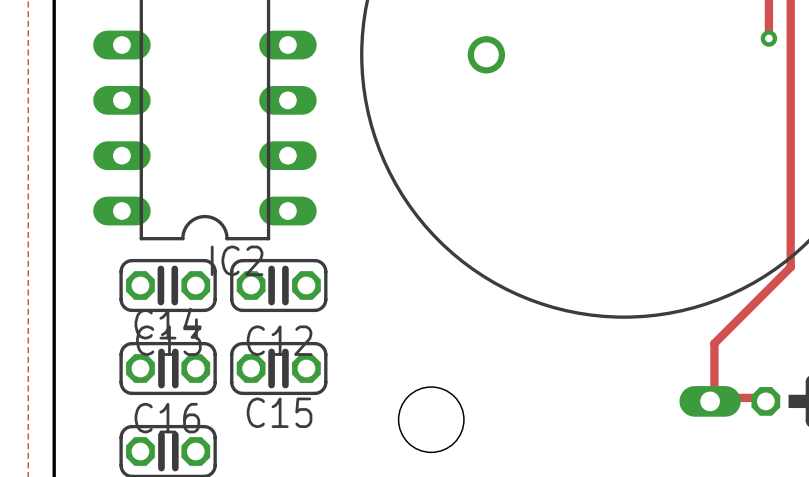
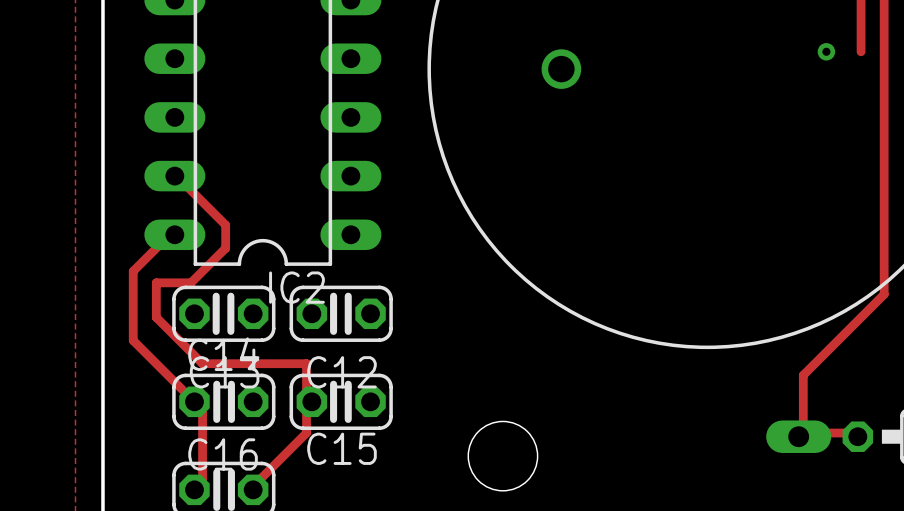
via position: (768, 38) -> (826, 51)
track: none -> (174, 176) (225, 225) (225, 248) (191, 282) (156, 282) (156, 317) (202, 363) (306, 363) (306, 398) (311, 401) (306, 409) (306, 433) (260, 479) (253, 489)
track: none -> (174, 234) (167, 236) (133, 271) (133, 340) (202, 409) (202, 479) (194, 489)

